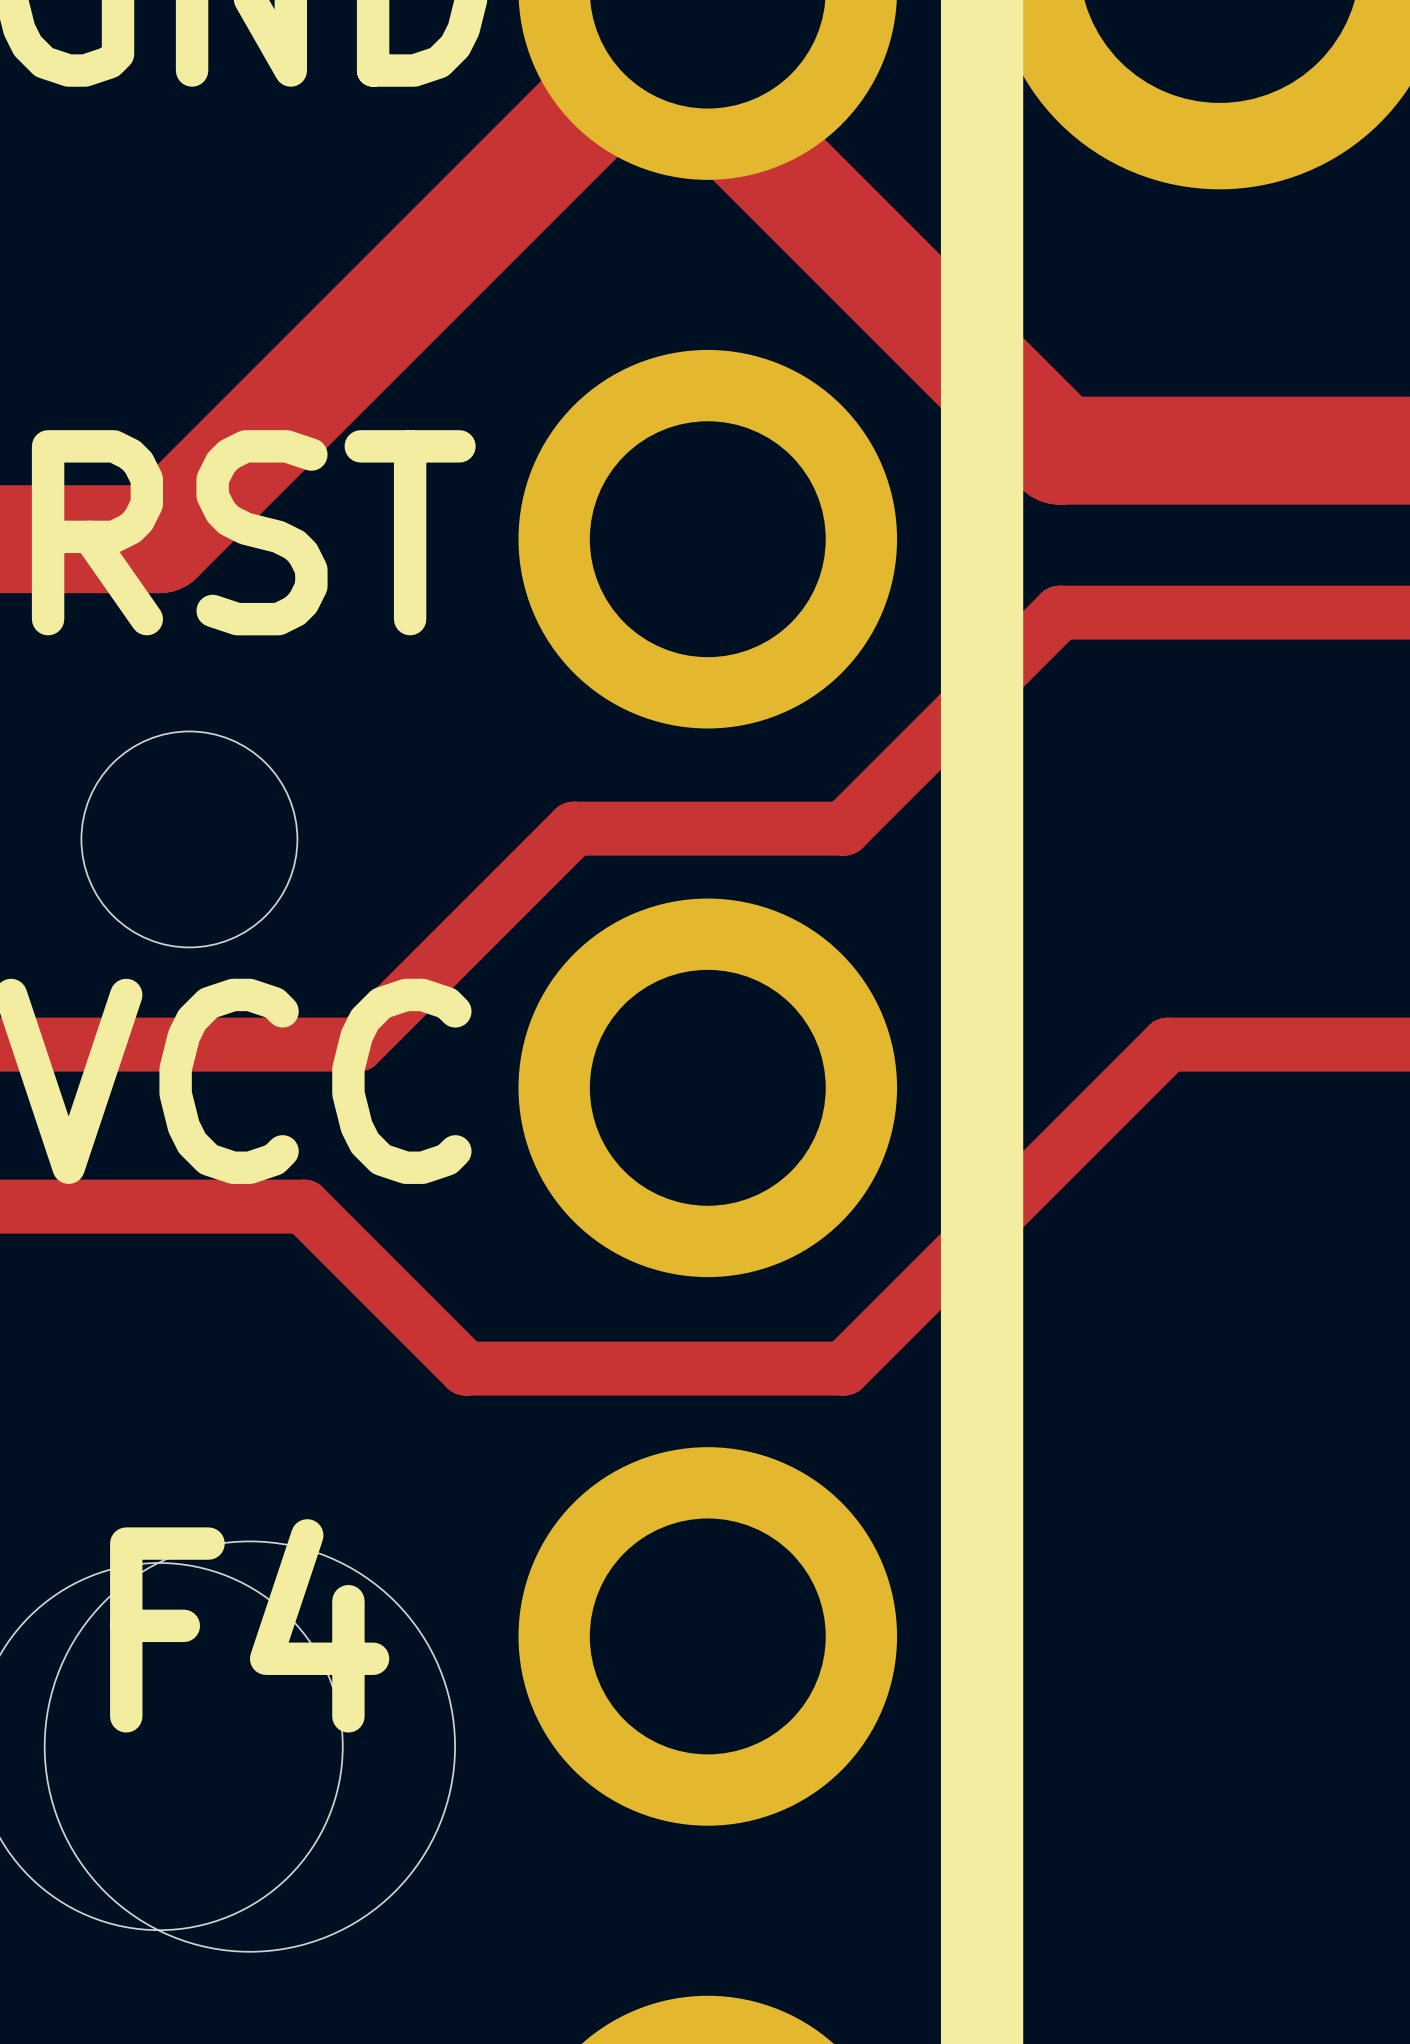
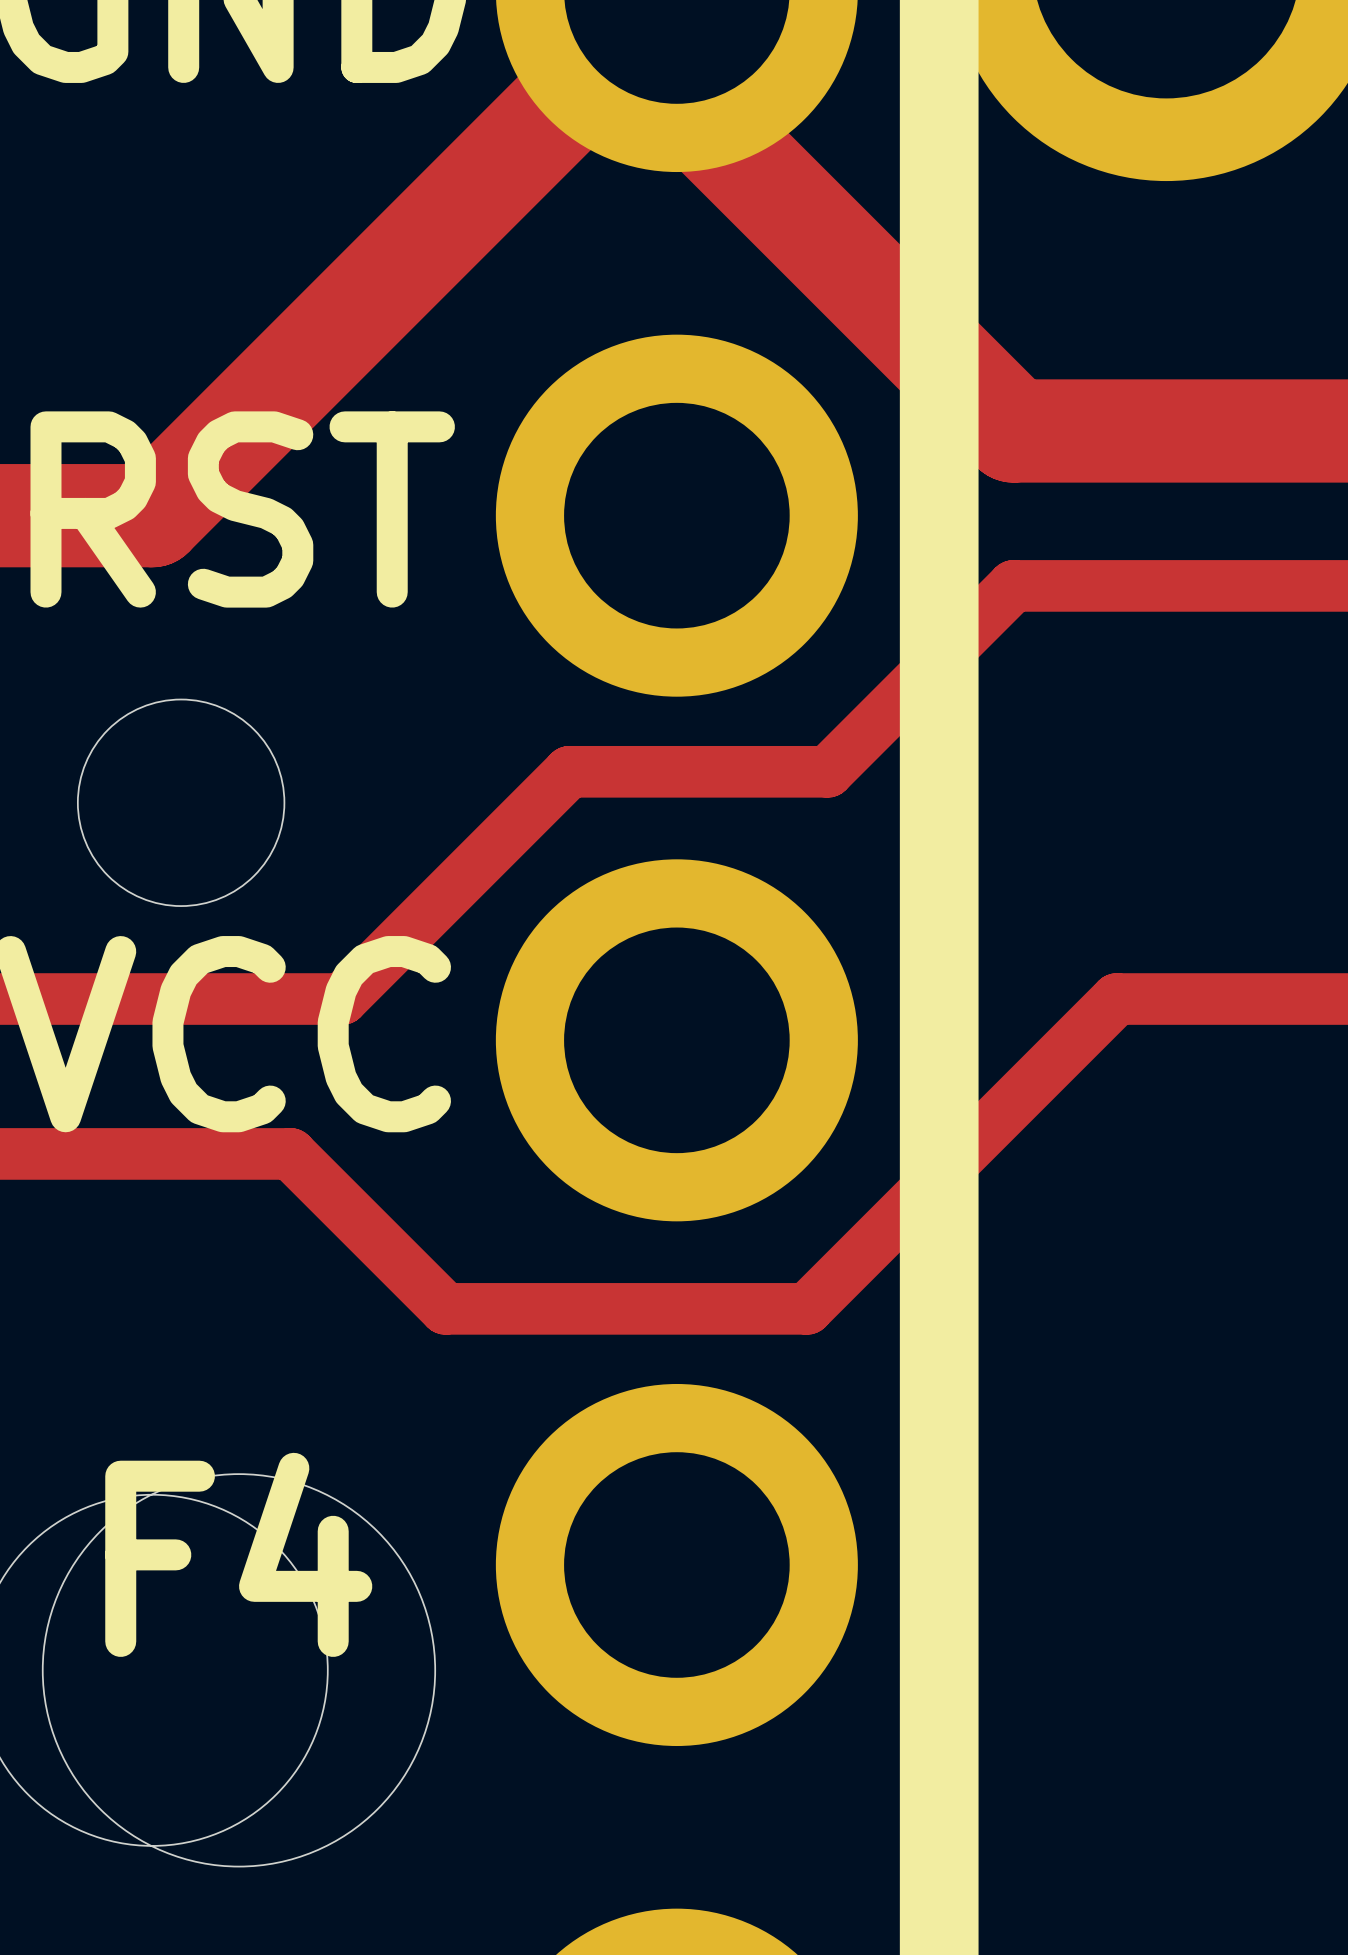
track: (865, 807) (843, 828) (573, 828) -> (827, 771) (569, 771) (548, 792)

